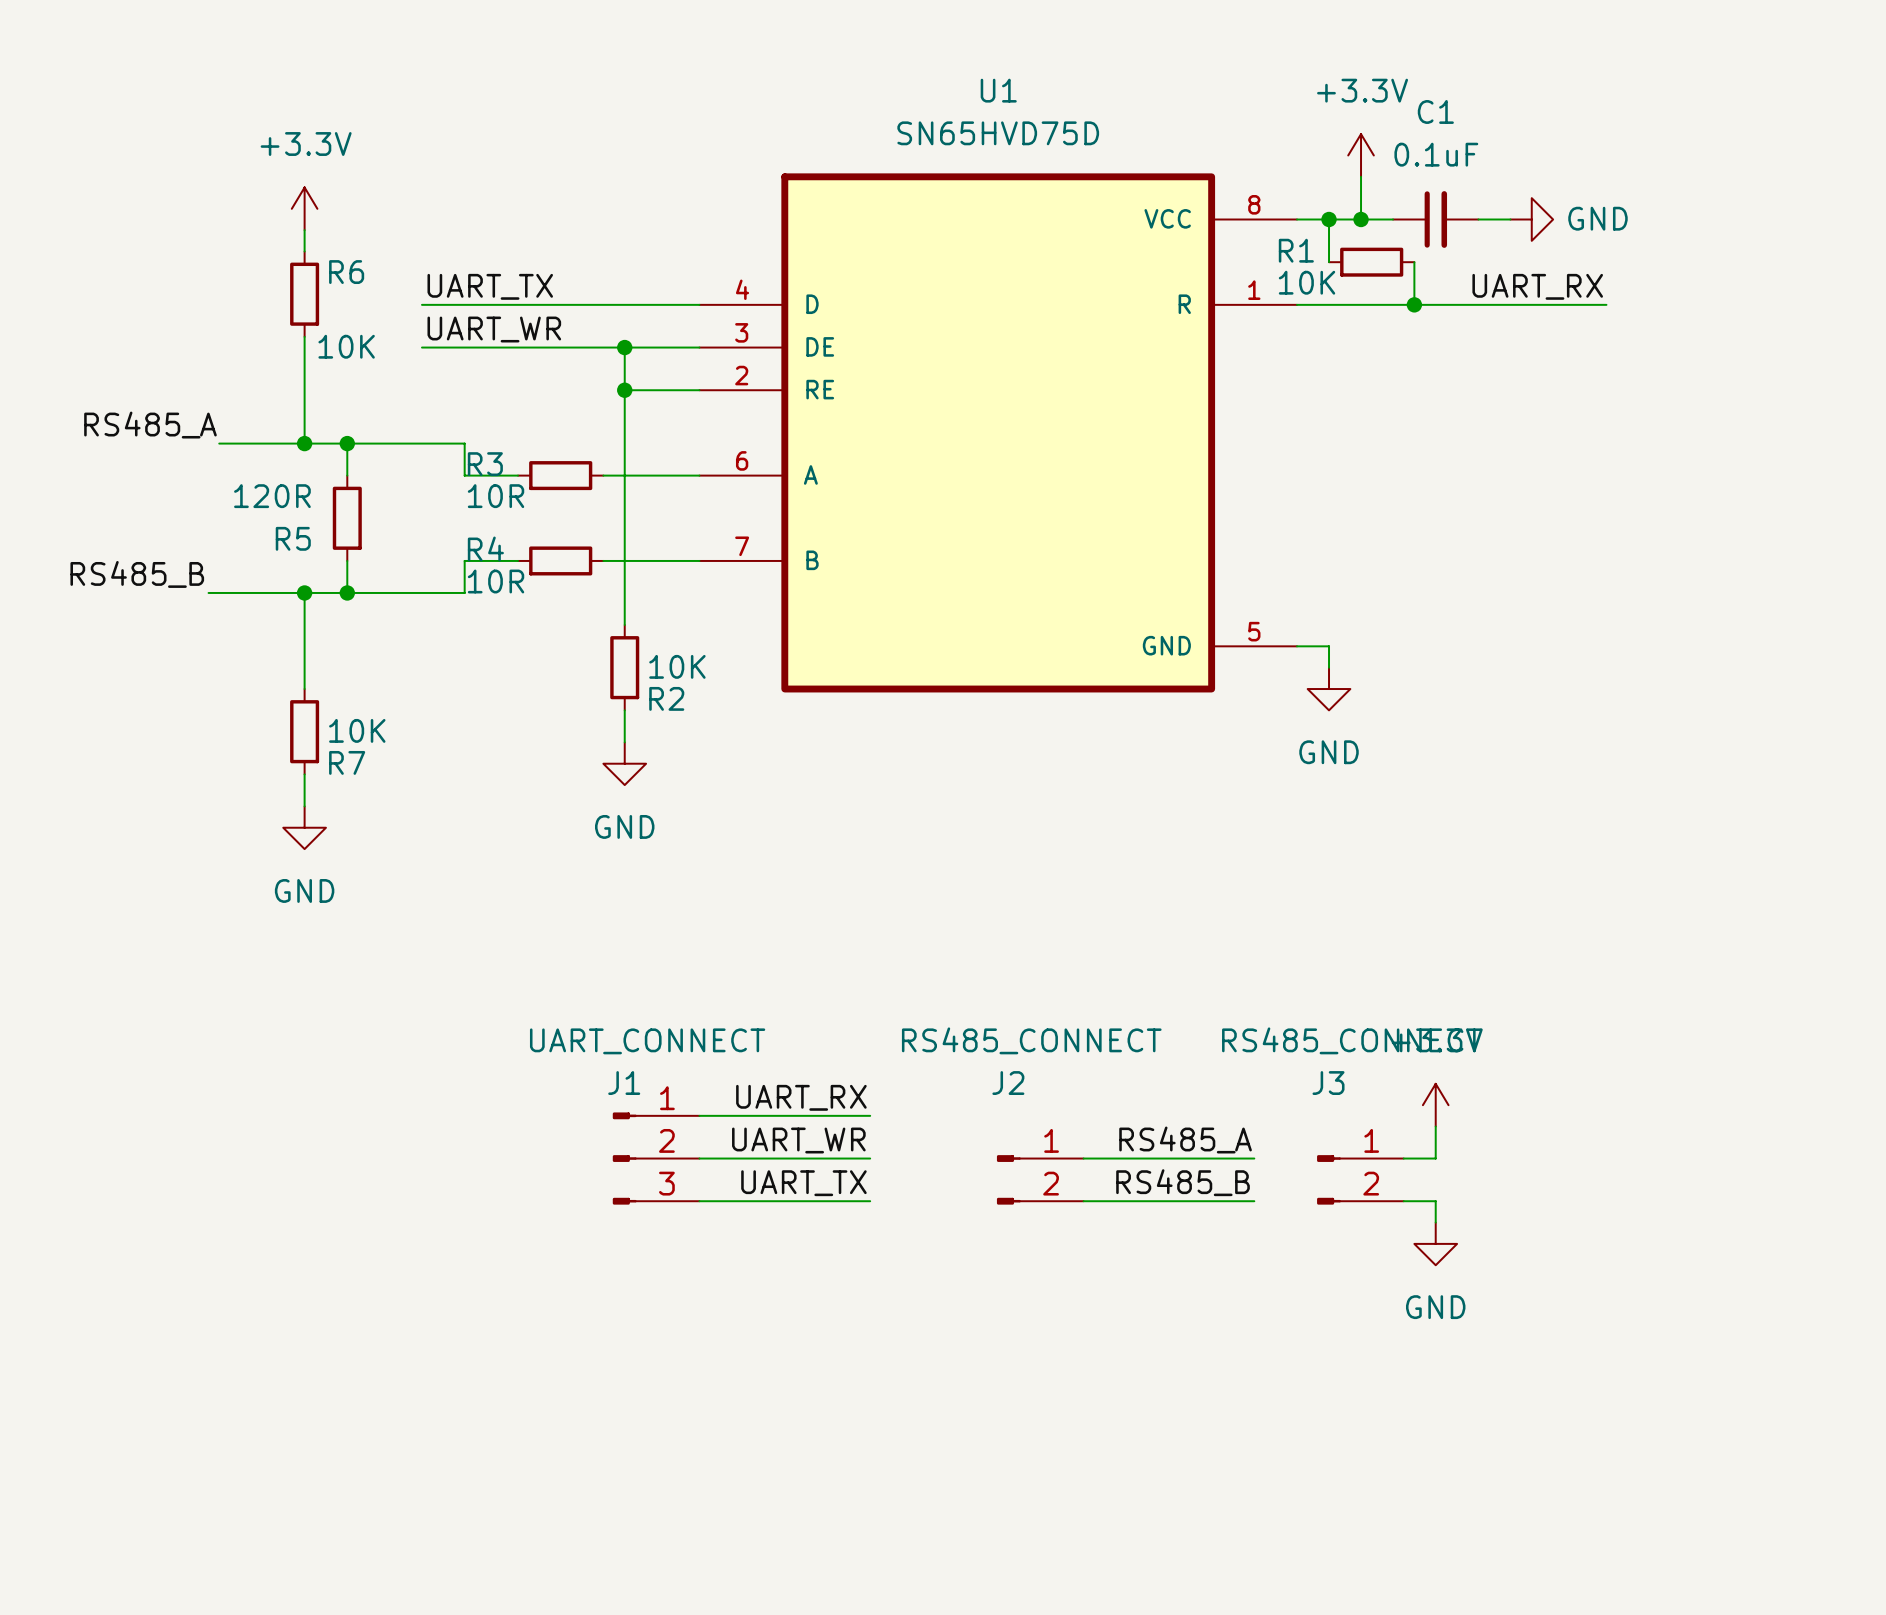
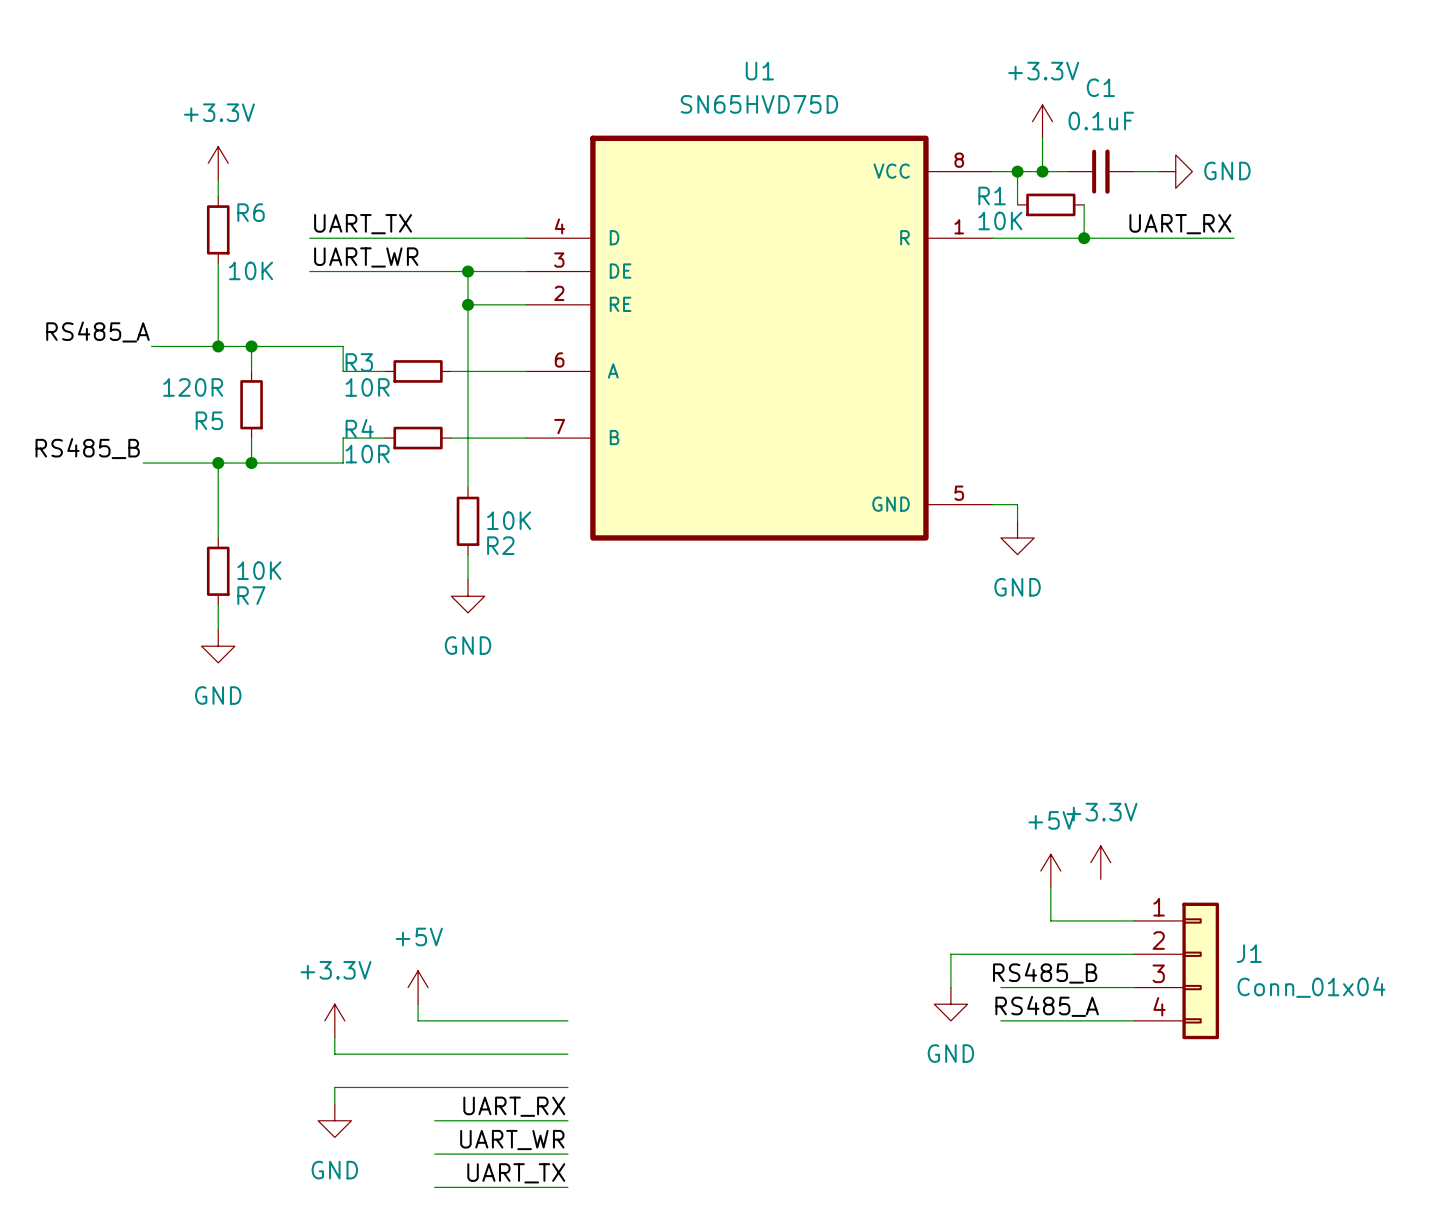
J1 value: UART_CONNECT (647, 1041) -> Conn_01x04 (1311, 987)
J1 name position: J1 (624, 1083) -> J1 (1249, 953)
label position: UART_RX (801, 1097) -> UART_RX (514, 1106)
J1 symbol: [612, 1112, 700, 1205] -> [1134, 902, 1220, 1040]
wire: (699, 1115) (870, 1115) -> (434, 1120) (567, 1120)
power symbol: none -> +5V (1050, 871)
wire: (1435, 1126) (1435, 1158) (1403, 1158) -> none
wire: none -> (1050, 887) (1050, 920) (1134, 920)
label position: UART_WR (798, 1140) -> UART_WR (512, 1140)
label position: RS485_A (1185, 1140) -> RS485_A (1047, 1006)
wire: (699, 1158) (870, 1158) -> (434, 1154) (567, 1154)
wire: (1083, 1158) (1254, 1158) -> (1000, 987) (1134, 987)
J2: RS485_CONNECT (1040, 1179) -> none
J3: RS485_CONNECT (1360, 1179) -> none
label position: RS485_B (1183, 1182) -> RS485_B (1045, 973)
label position: UART_TX (803, 1183) -> UART_TX (516, 1173)
wire: (699, 1201) (870, 1201) -> (434, 1187) (567, 1187)
wire: (1083, 1201) (1254, 1201) -> (1000, 1020) (1134, 1020)
wire: (1403, 1201) (1435, 1201) (1435, 1222) -> none
wire: none -> (1134, 954) (950, 954) (950, 987)
power symbol position: GND (1435, 1243) -> GND (950, 1004)
power symbol: none -> +5V (418, 987)
wire: none -> (418, 1004) (418, 1020) (567, 1020)
power symbol: none -> +3.3V (334, 1020)
wire: none -> (334, 1037) (334, 1054) (567, 1054)
wire: none -> (567, 1087) (334, 1087) (334, 1104)
power symbol: none -> GND (334, 1120)

